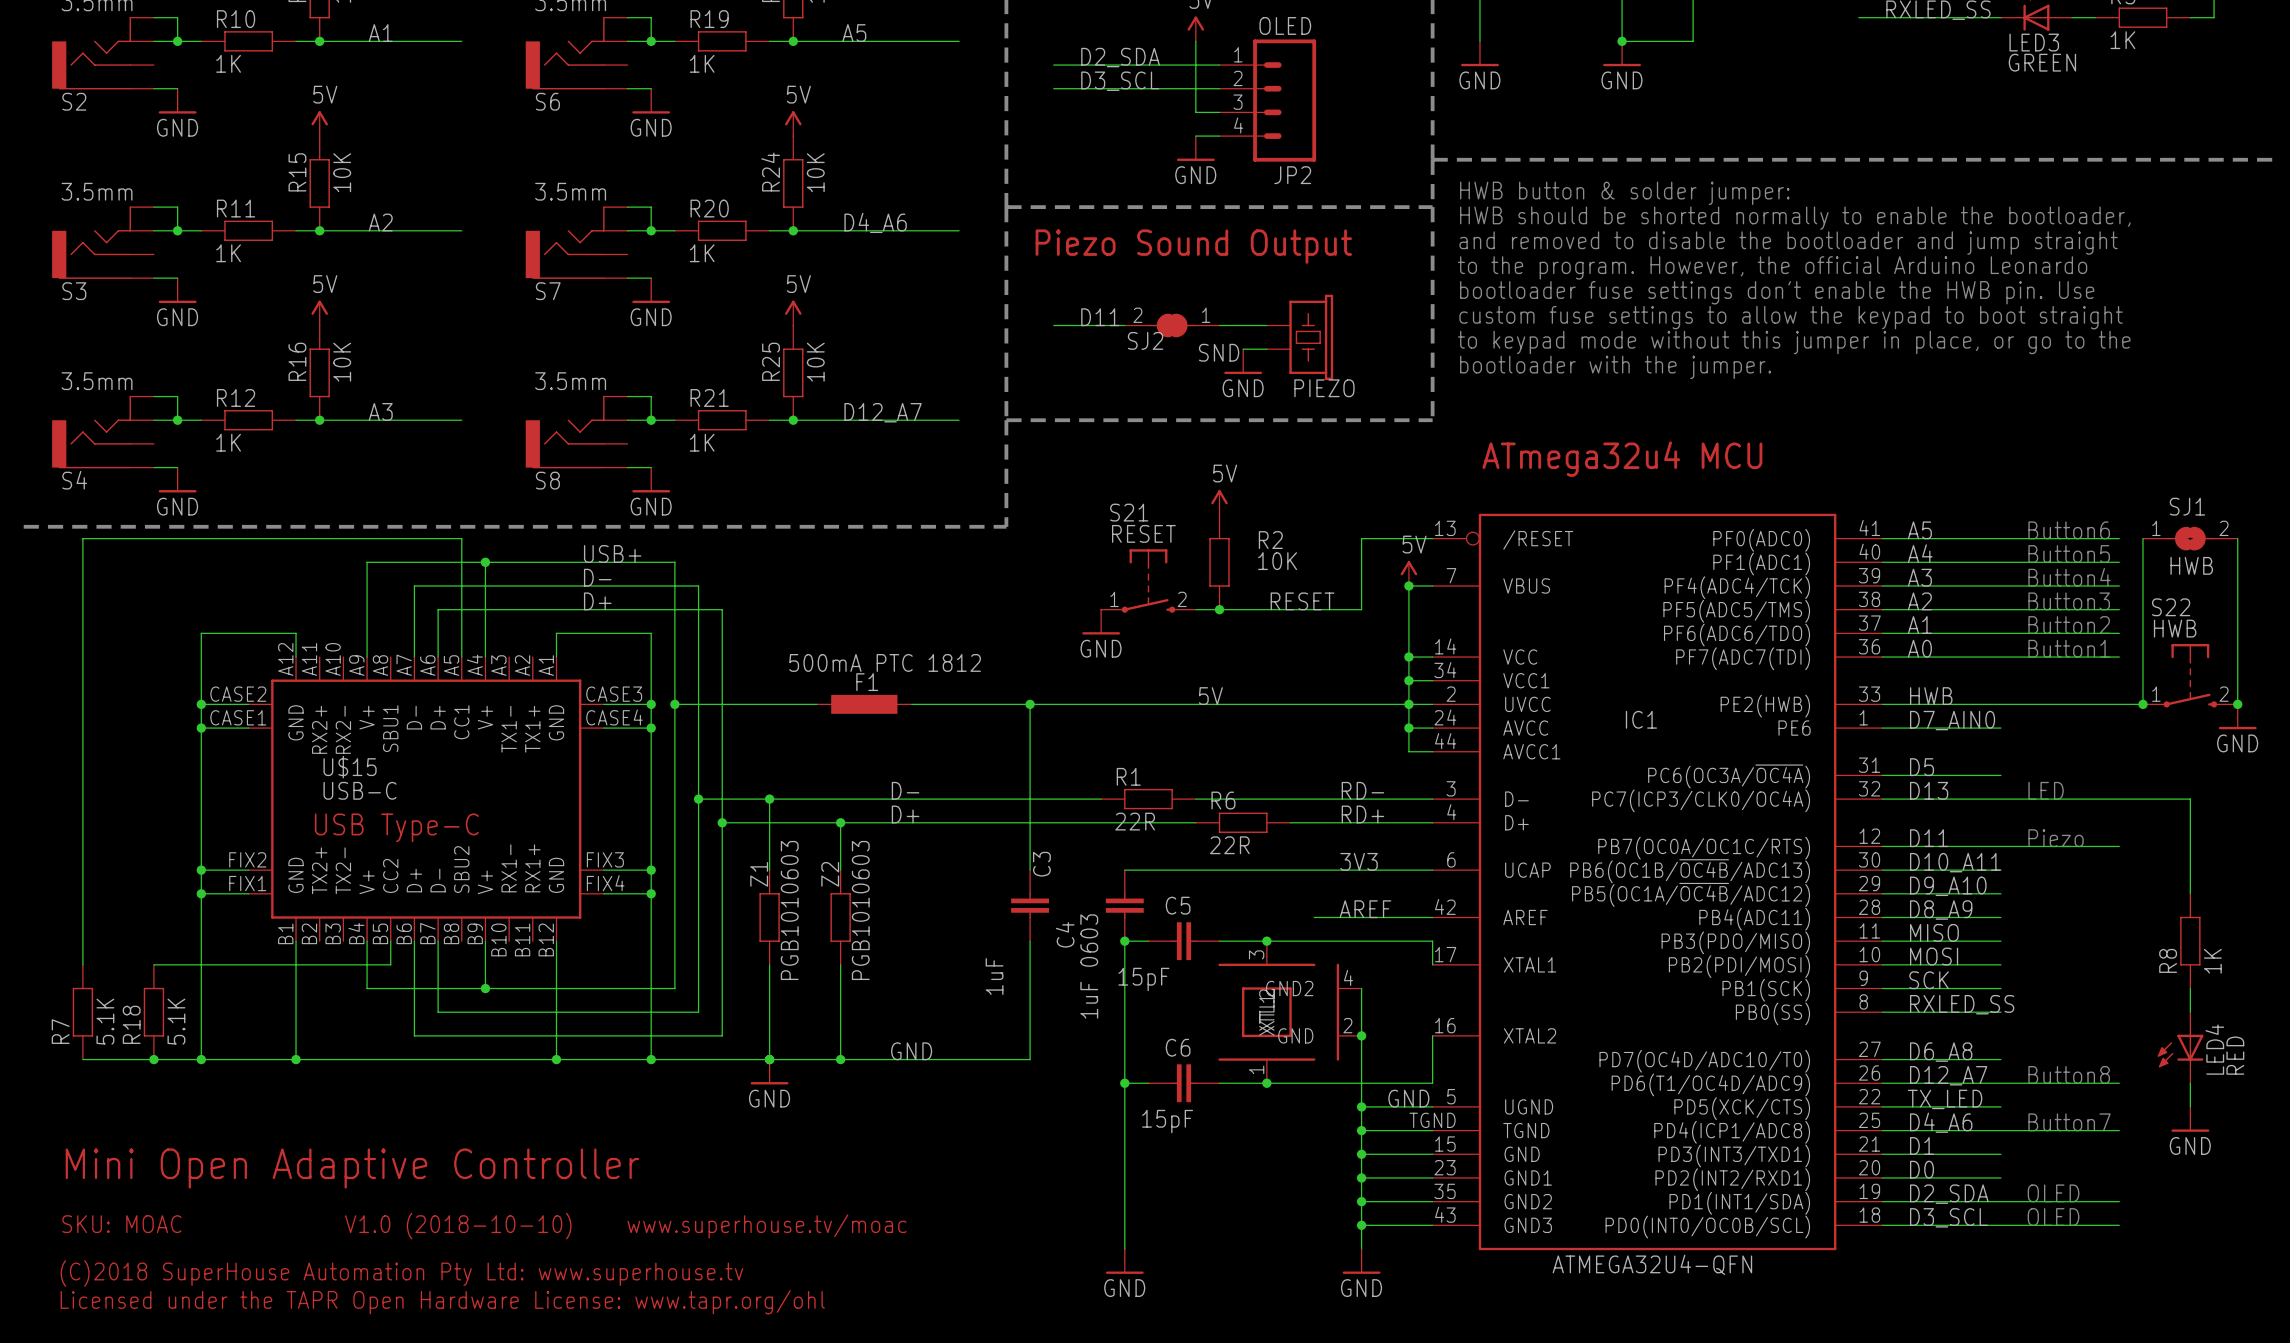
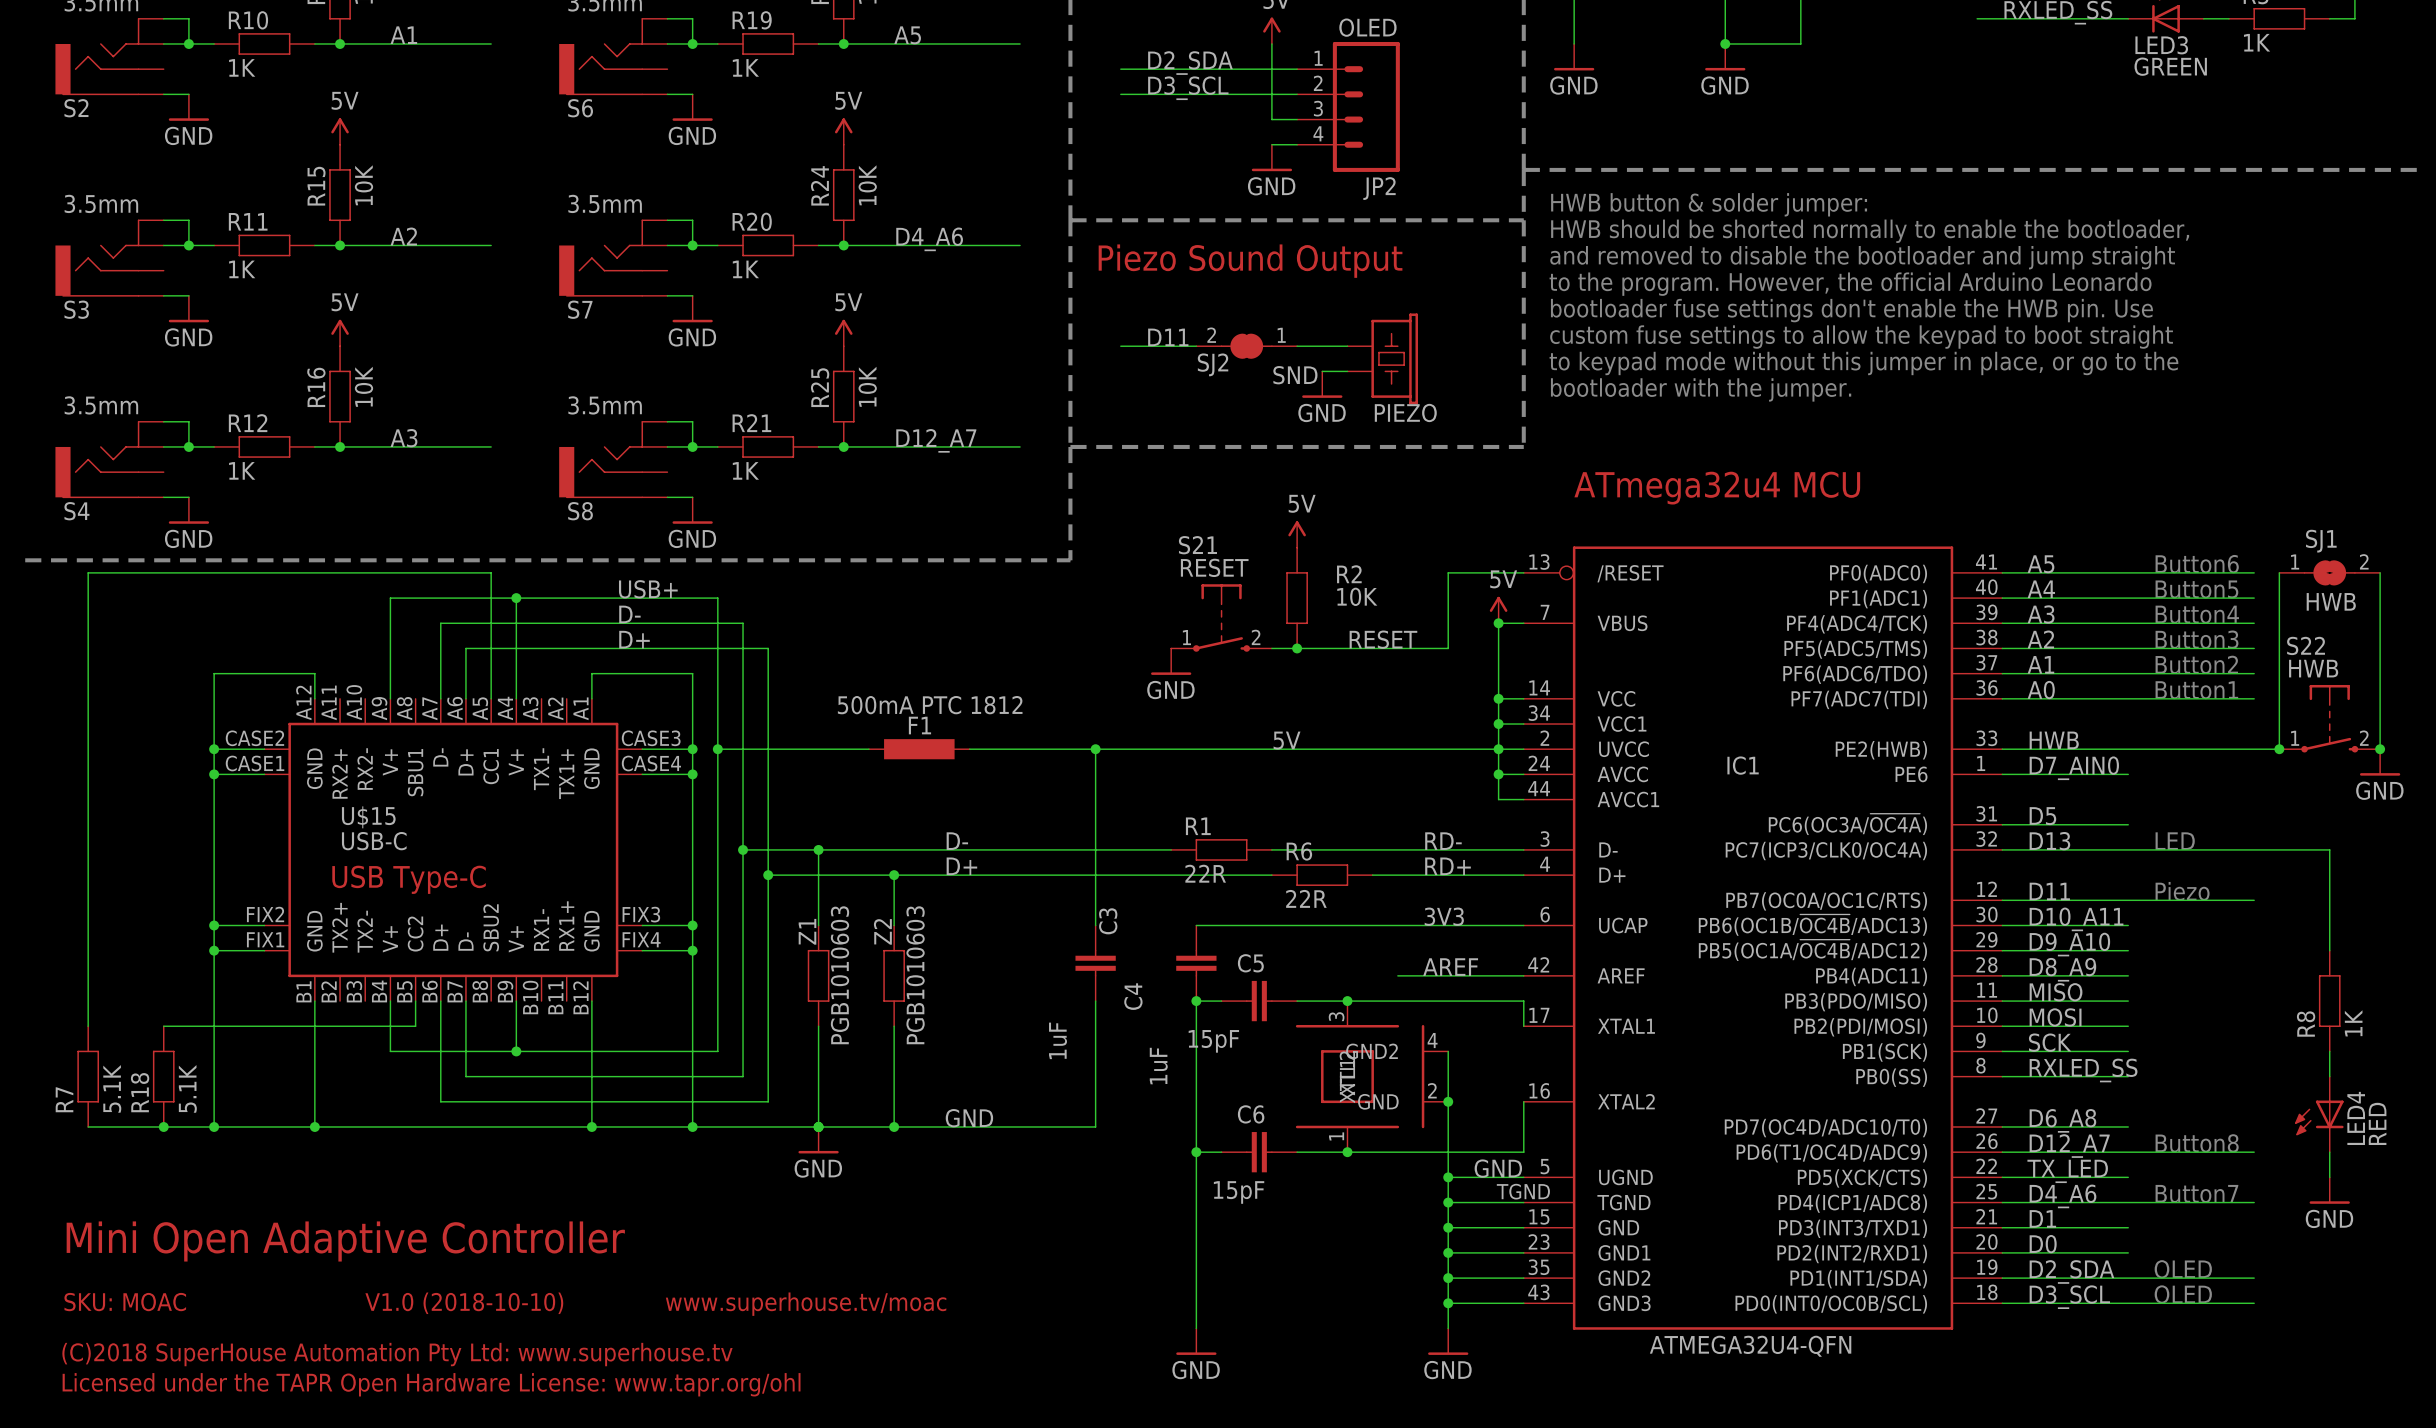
C4 value: 1uF 0603 (1089, 966) -> 1uF (1158, 1066)

